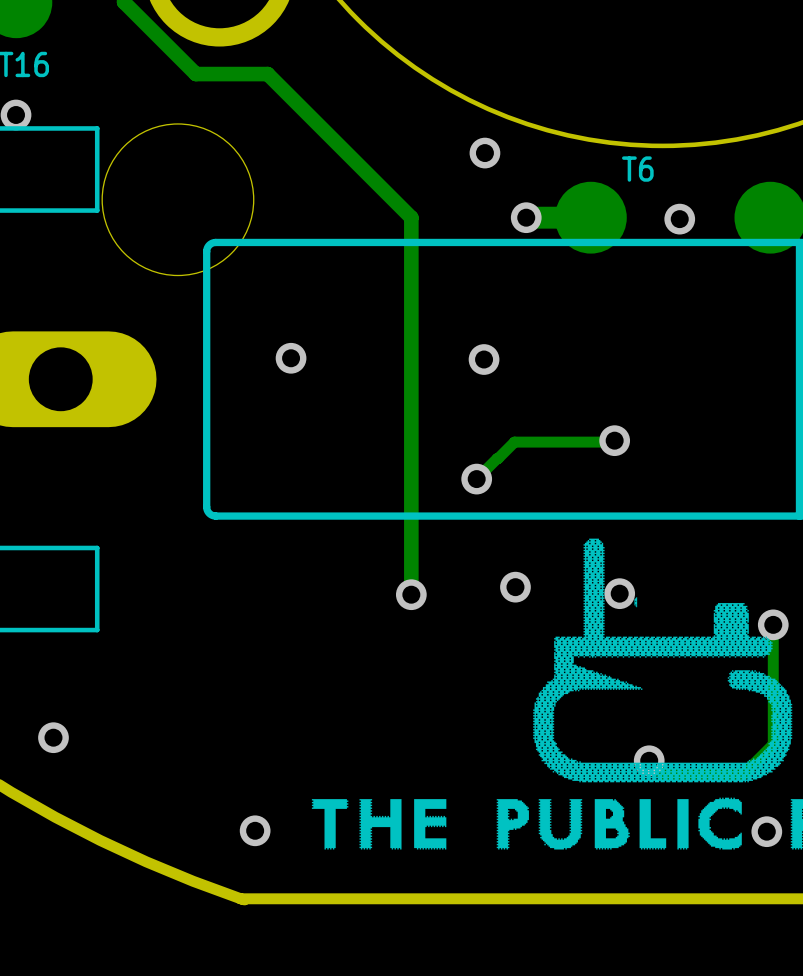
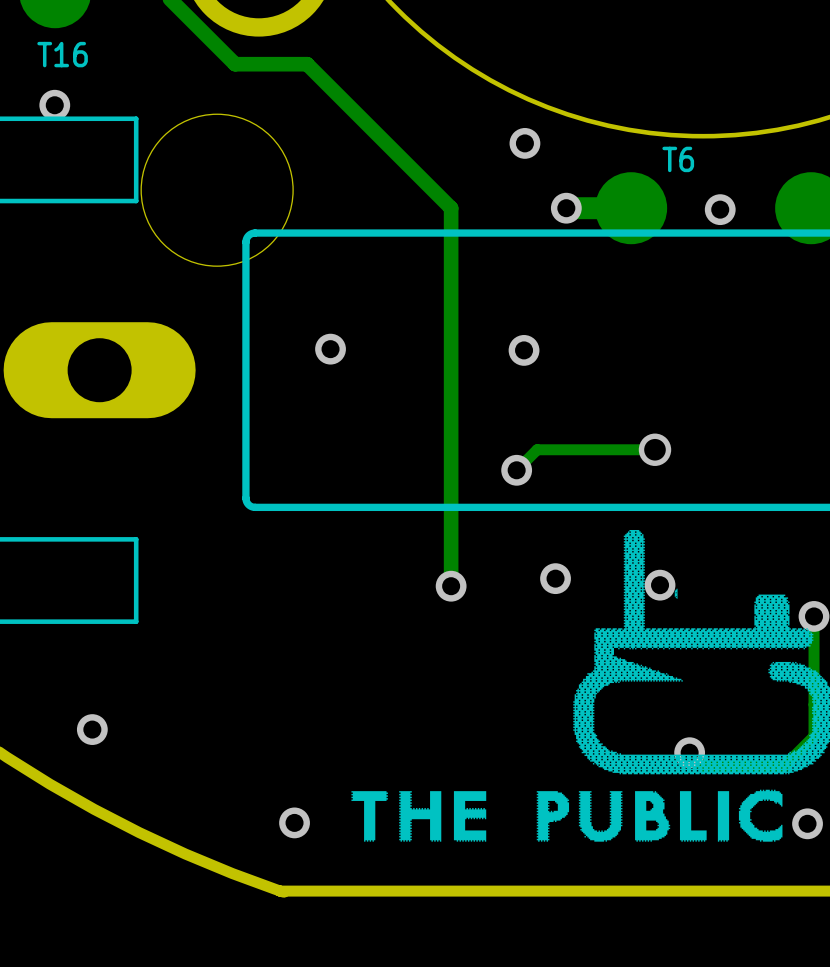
track: (614, 440) (514, 442) (498, 458) -> (654, 449) (538, 449)
via position: (614, 440) -> (654, 449)

